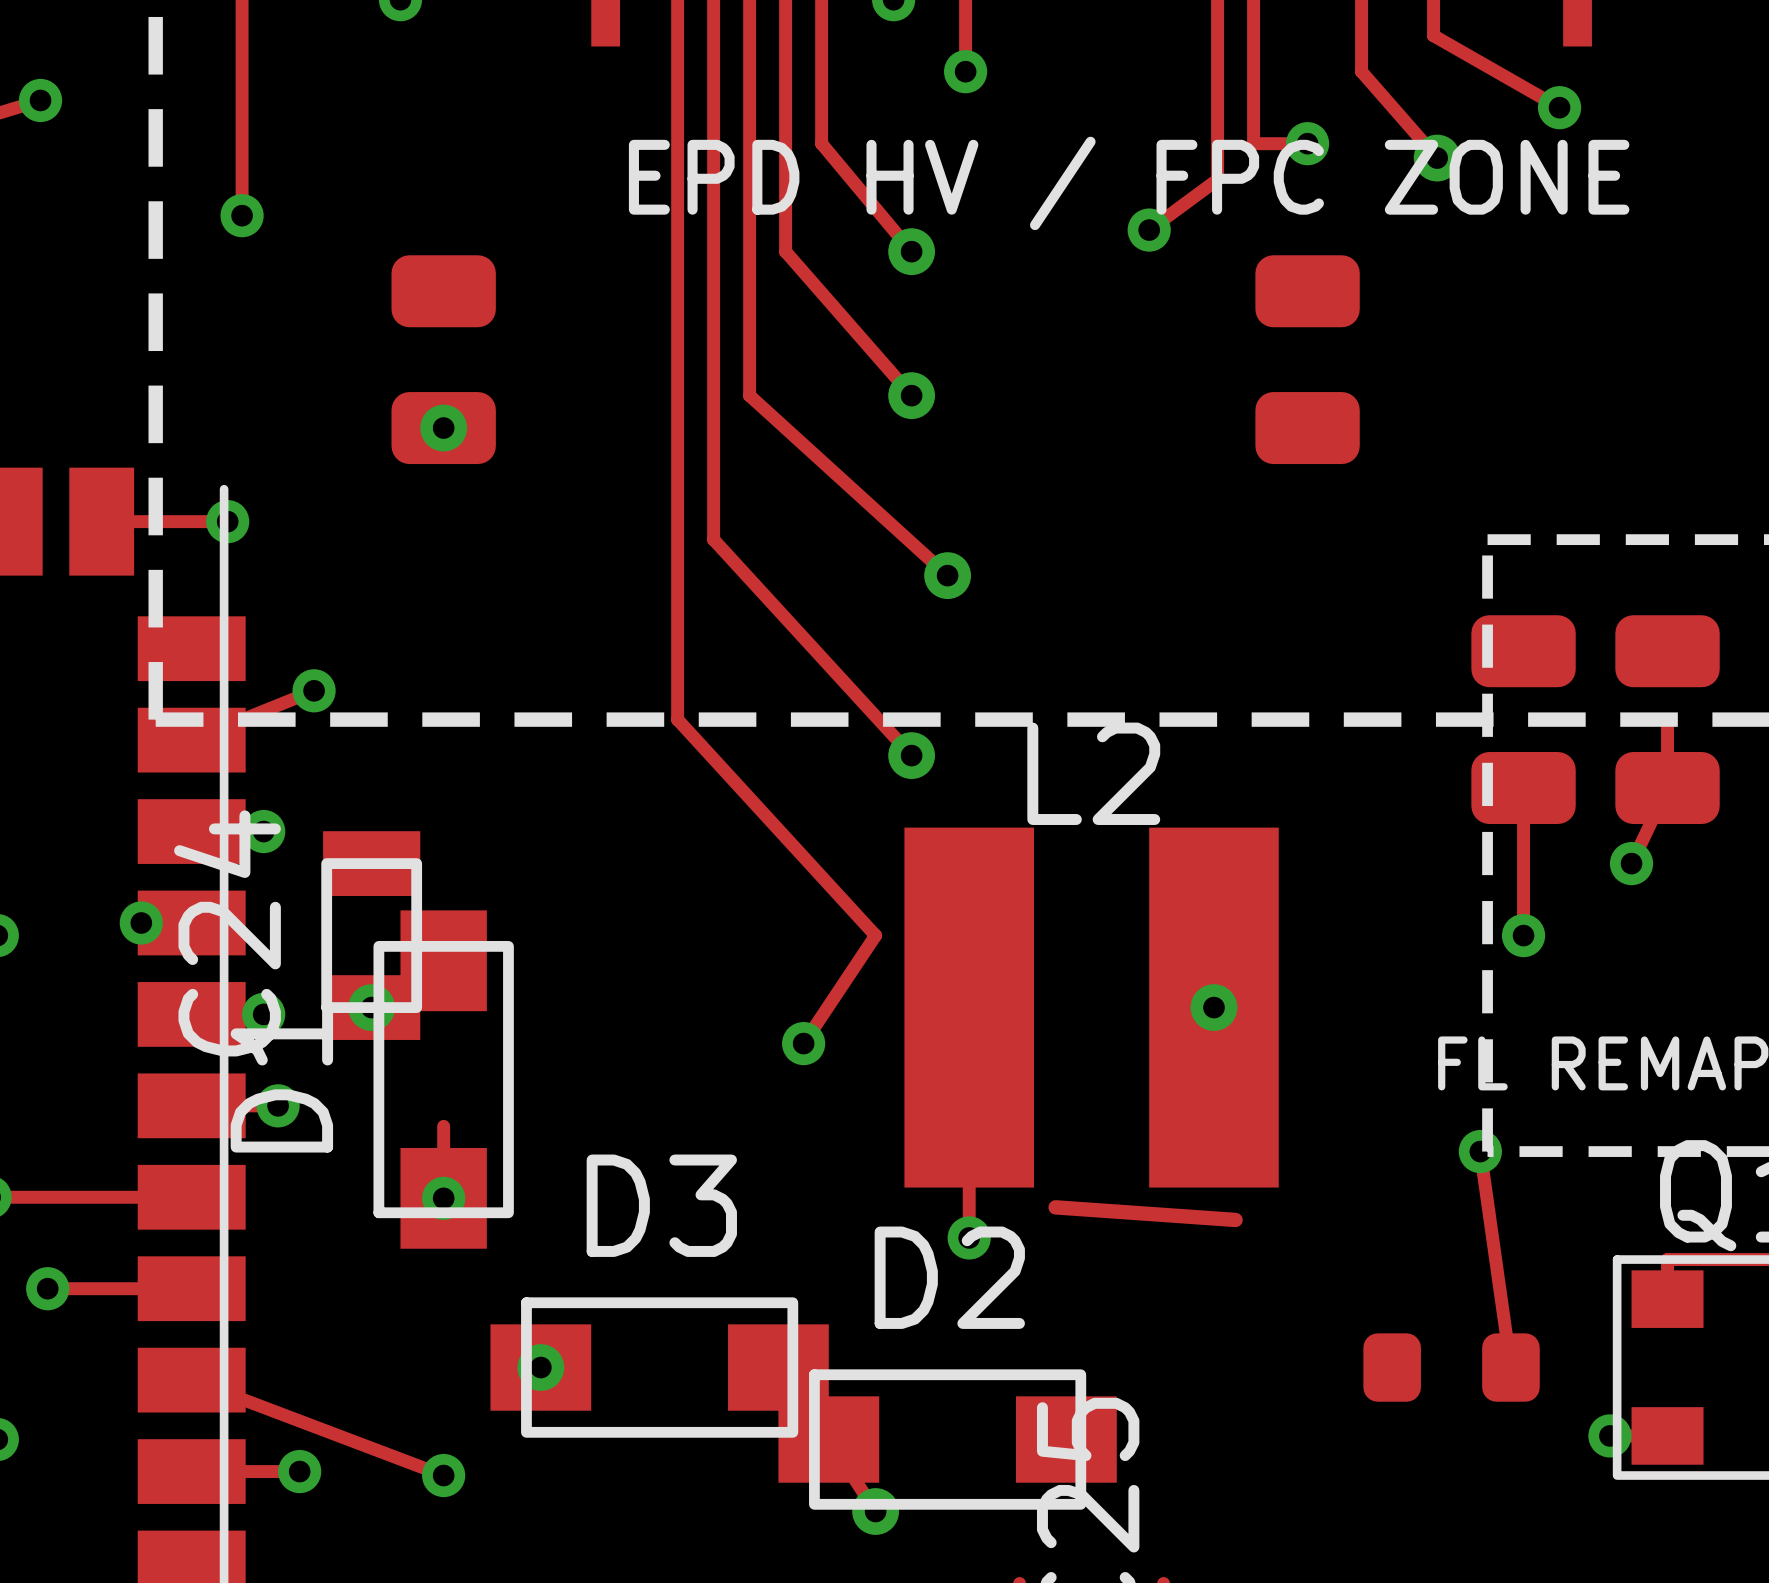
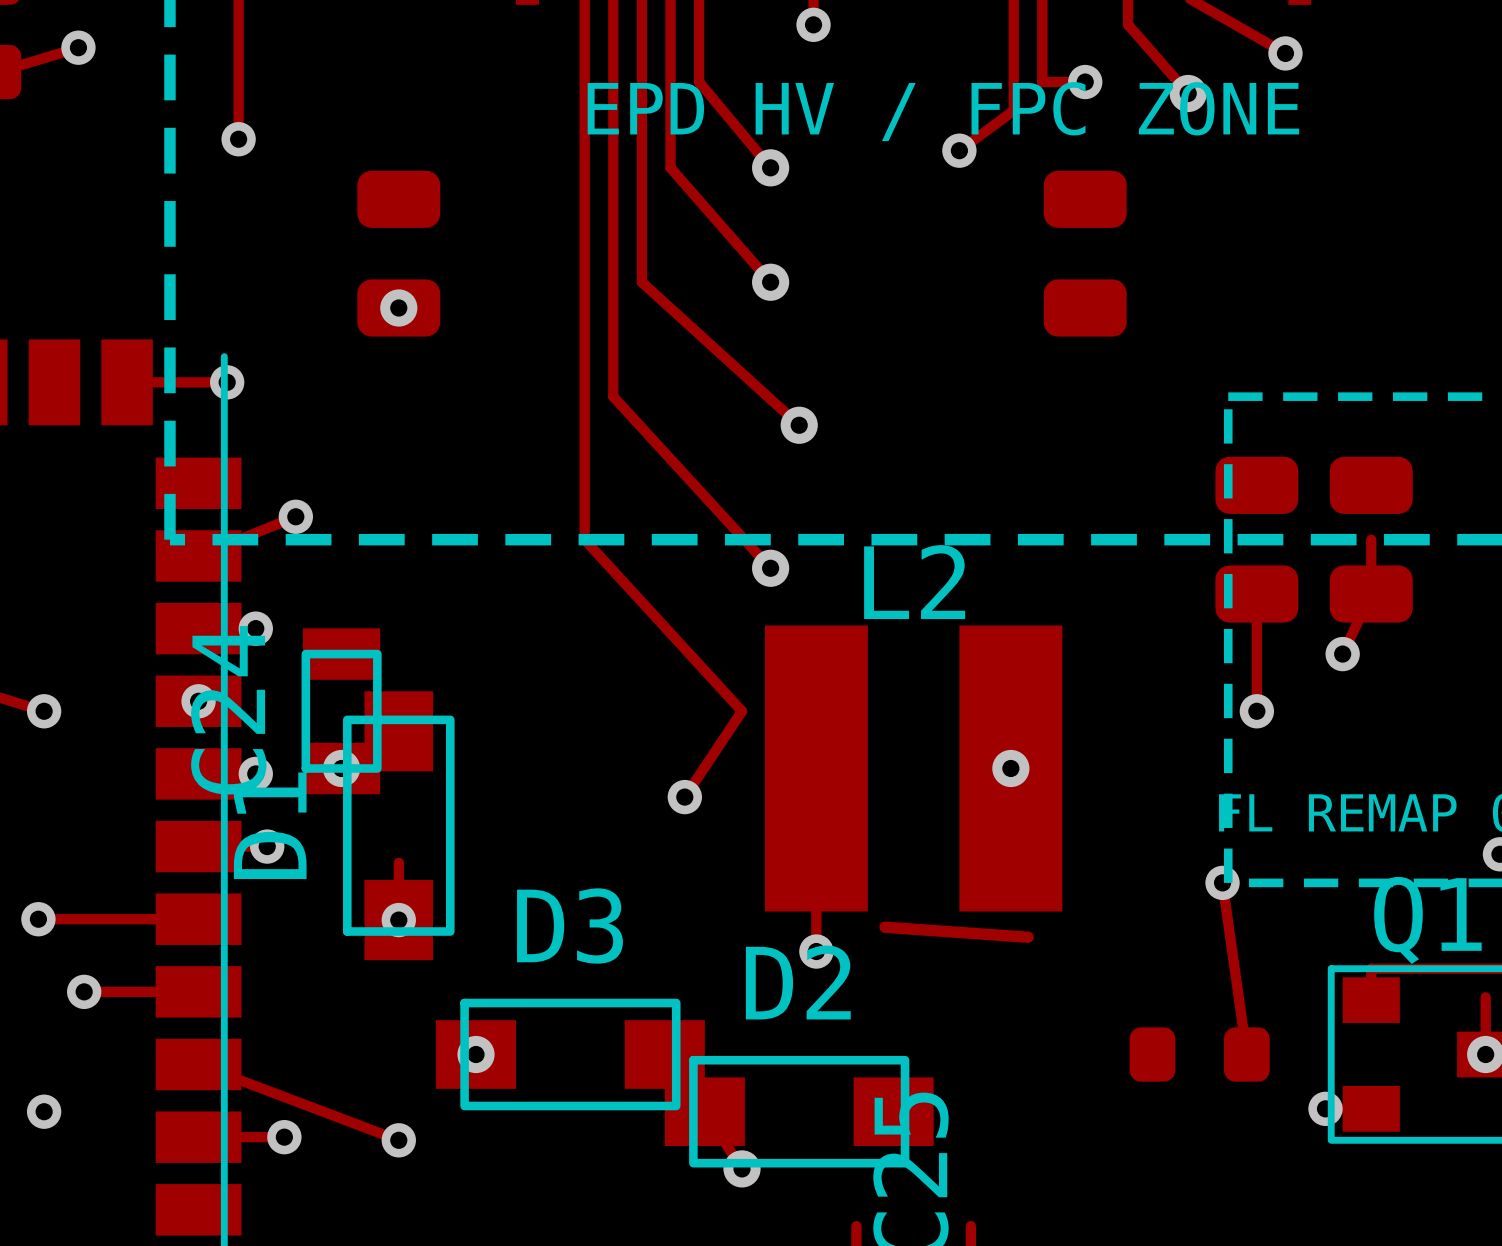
via position: (141, 922) -> (198, 701)

